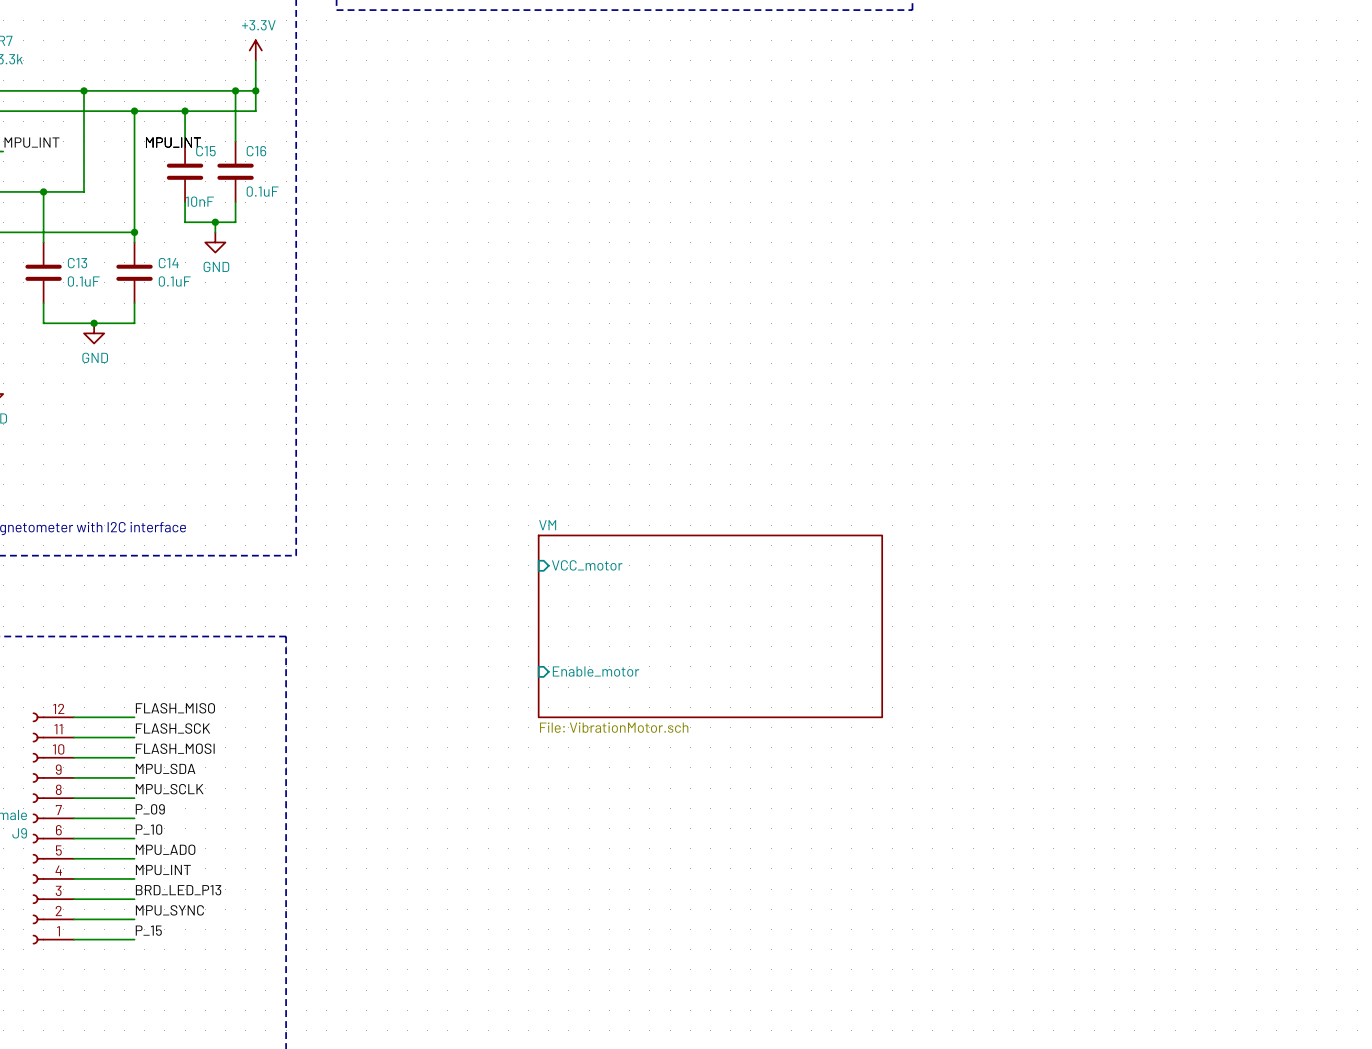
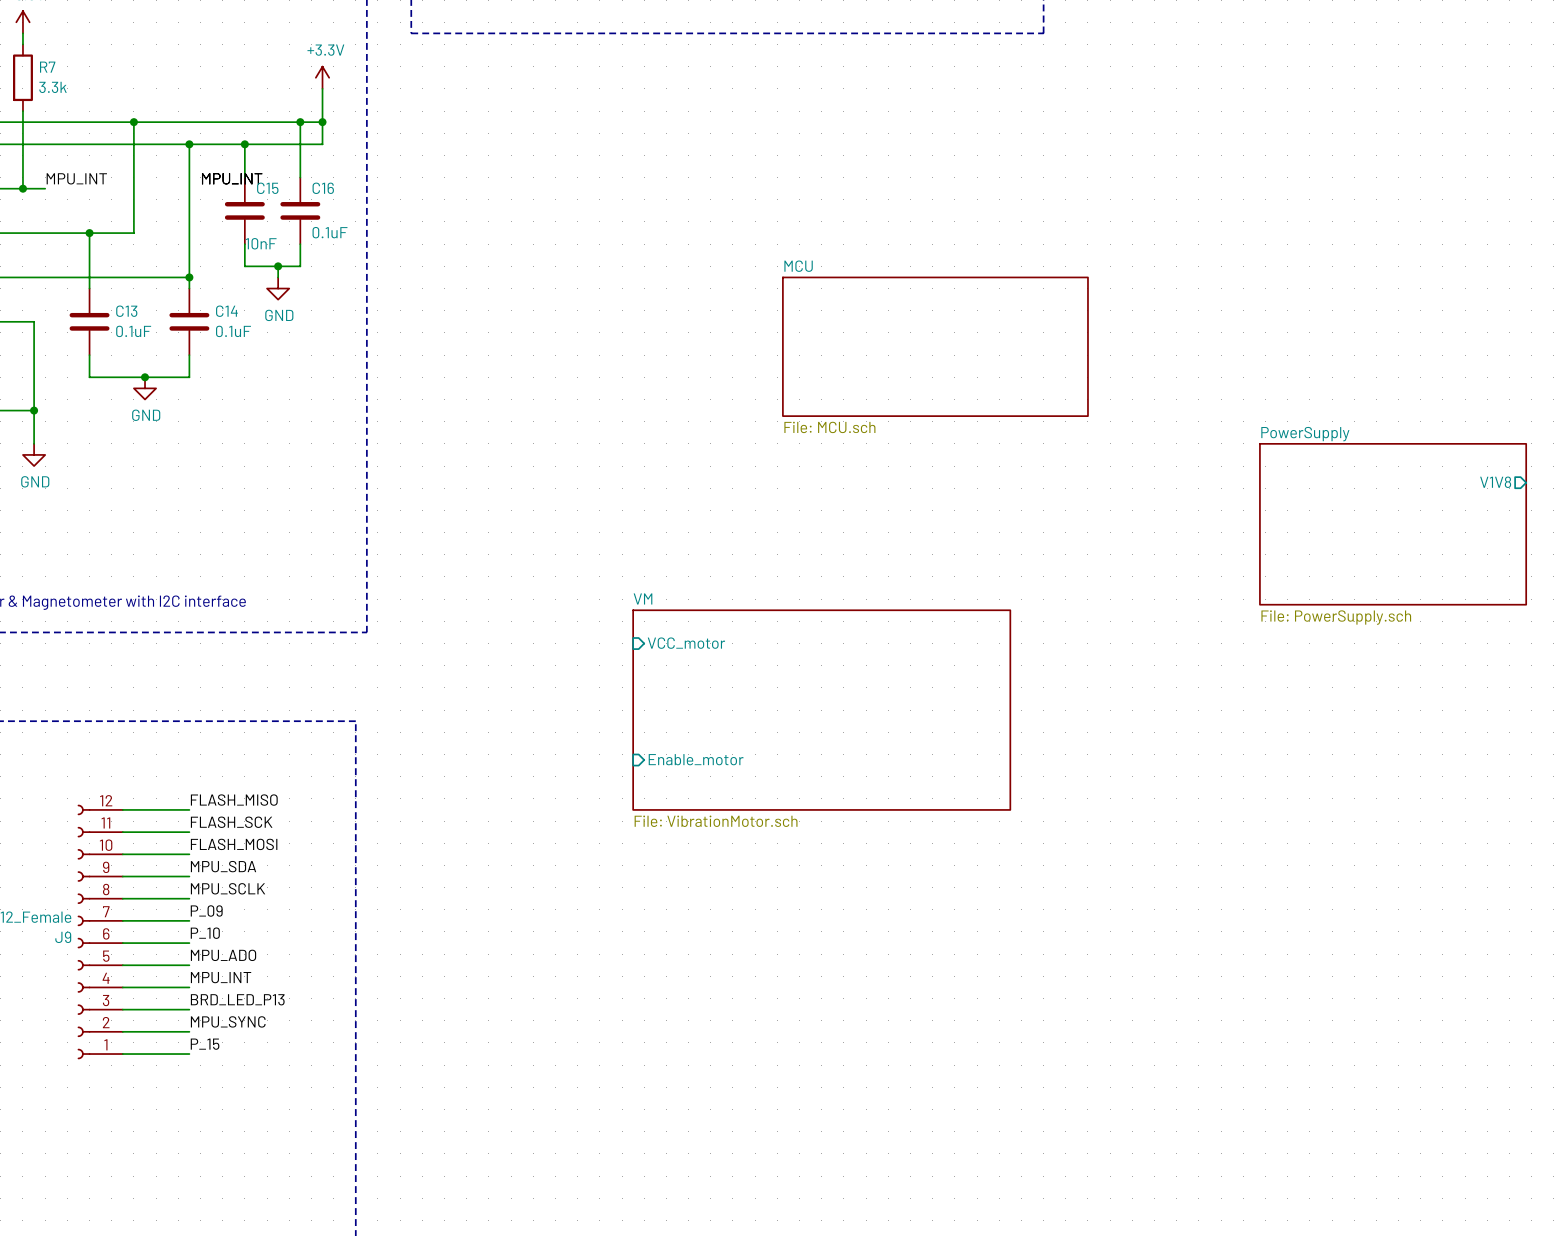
sheet MCU: none -> File: MCU.sch (935, 346)
sheet pin: none -> V1V8 (1495, 482)
sheet PowerSupply: none -> File: PowerSupply.sch (1393, 524)

